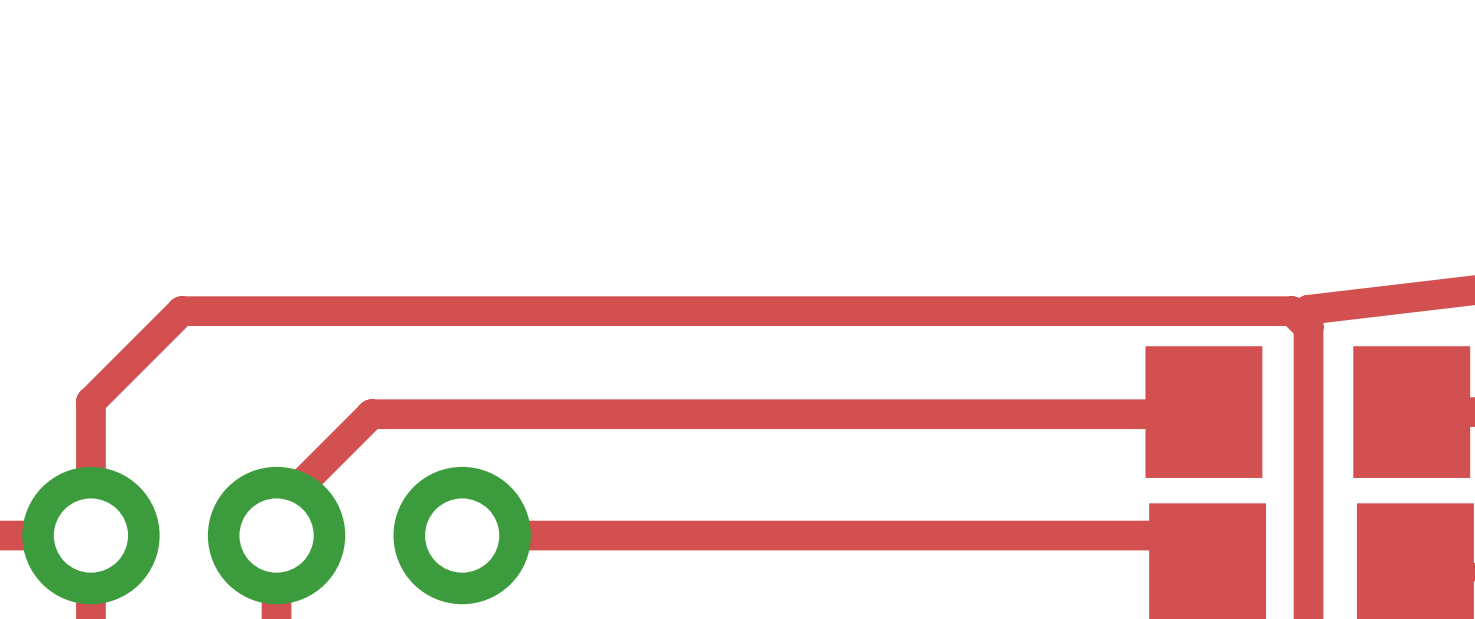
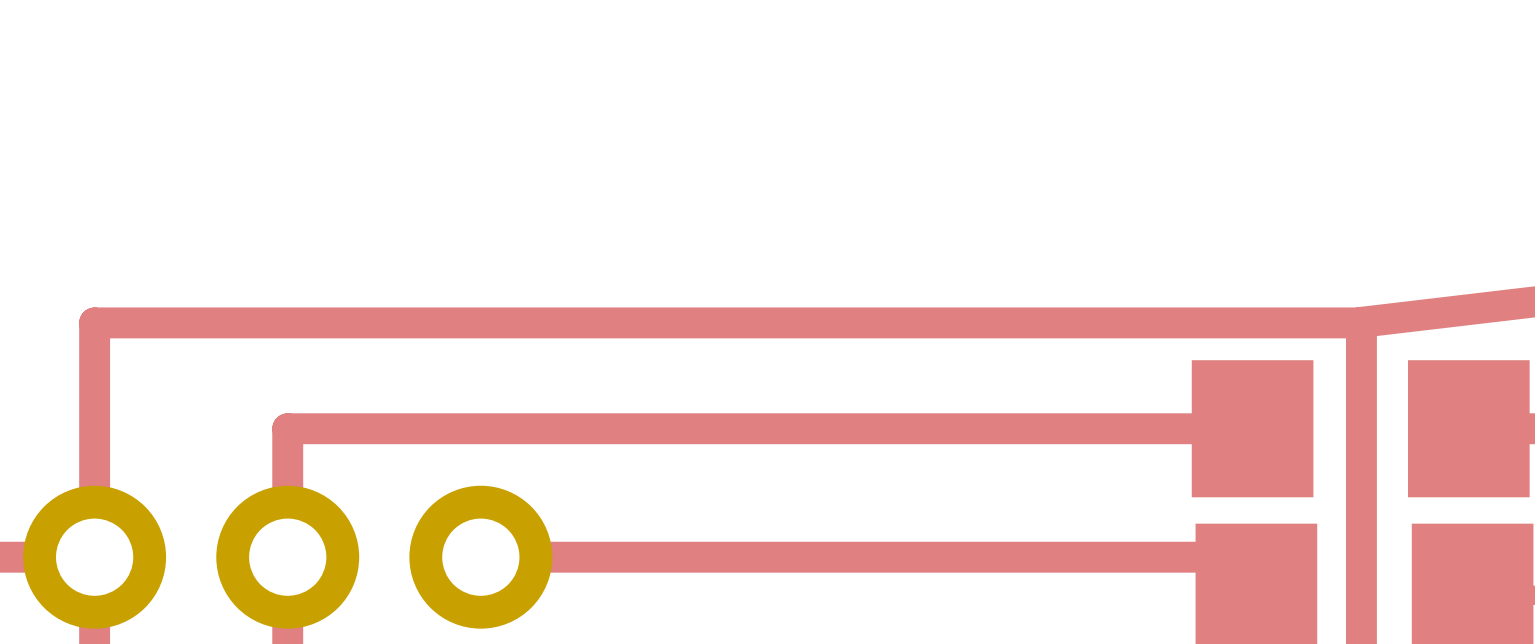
top track: (1308, 327) (1292, 311) (181, 311) (90, 401) -> (1361, 322) (94, 322) (94, 418)
top track: (1203, 412) (1201, 414) (371, 414) (276, 509) -> (1252, 428) (287, 428) (287, 529)

